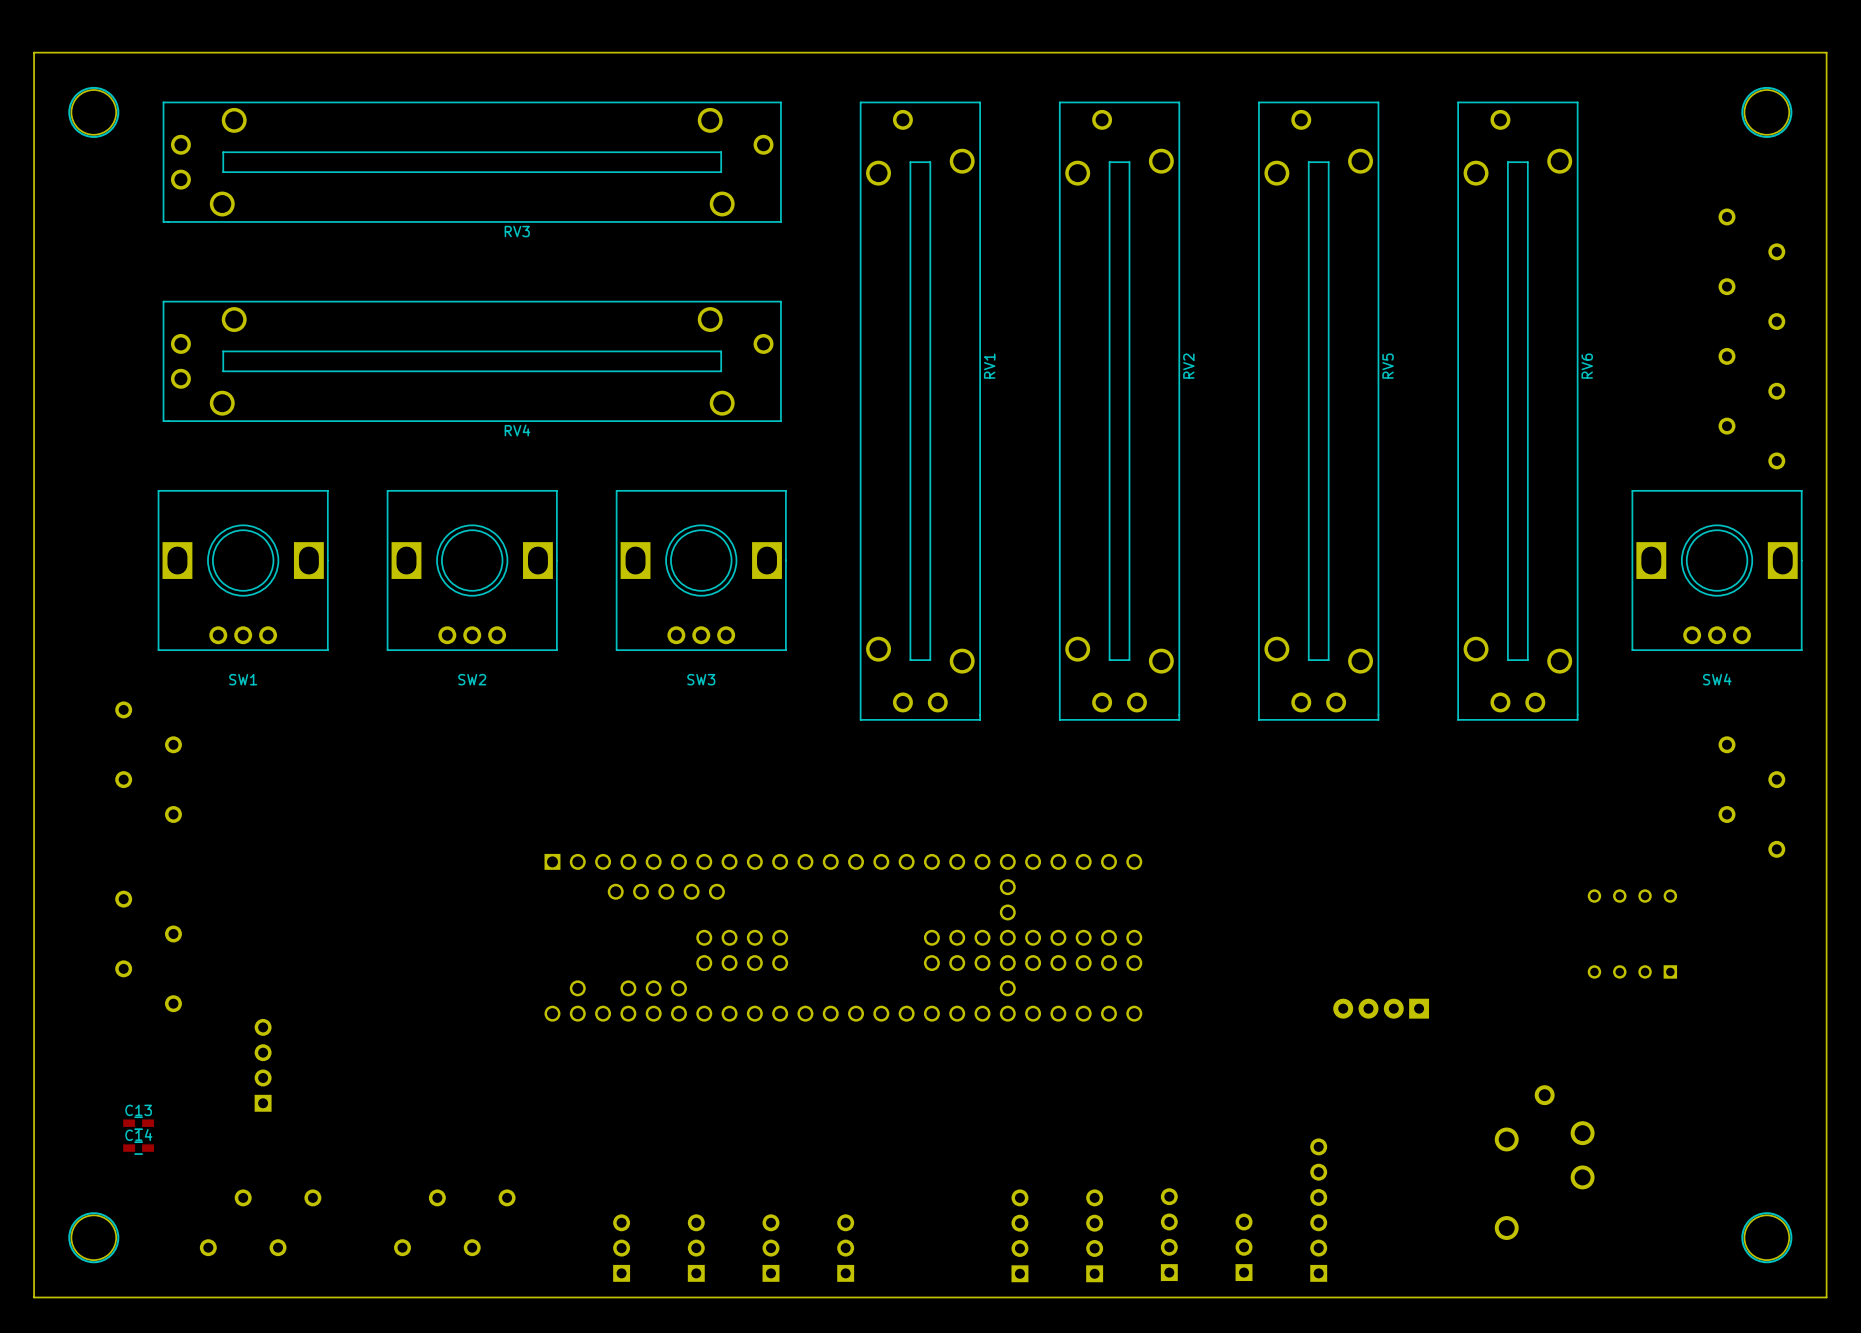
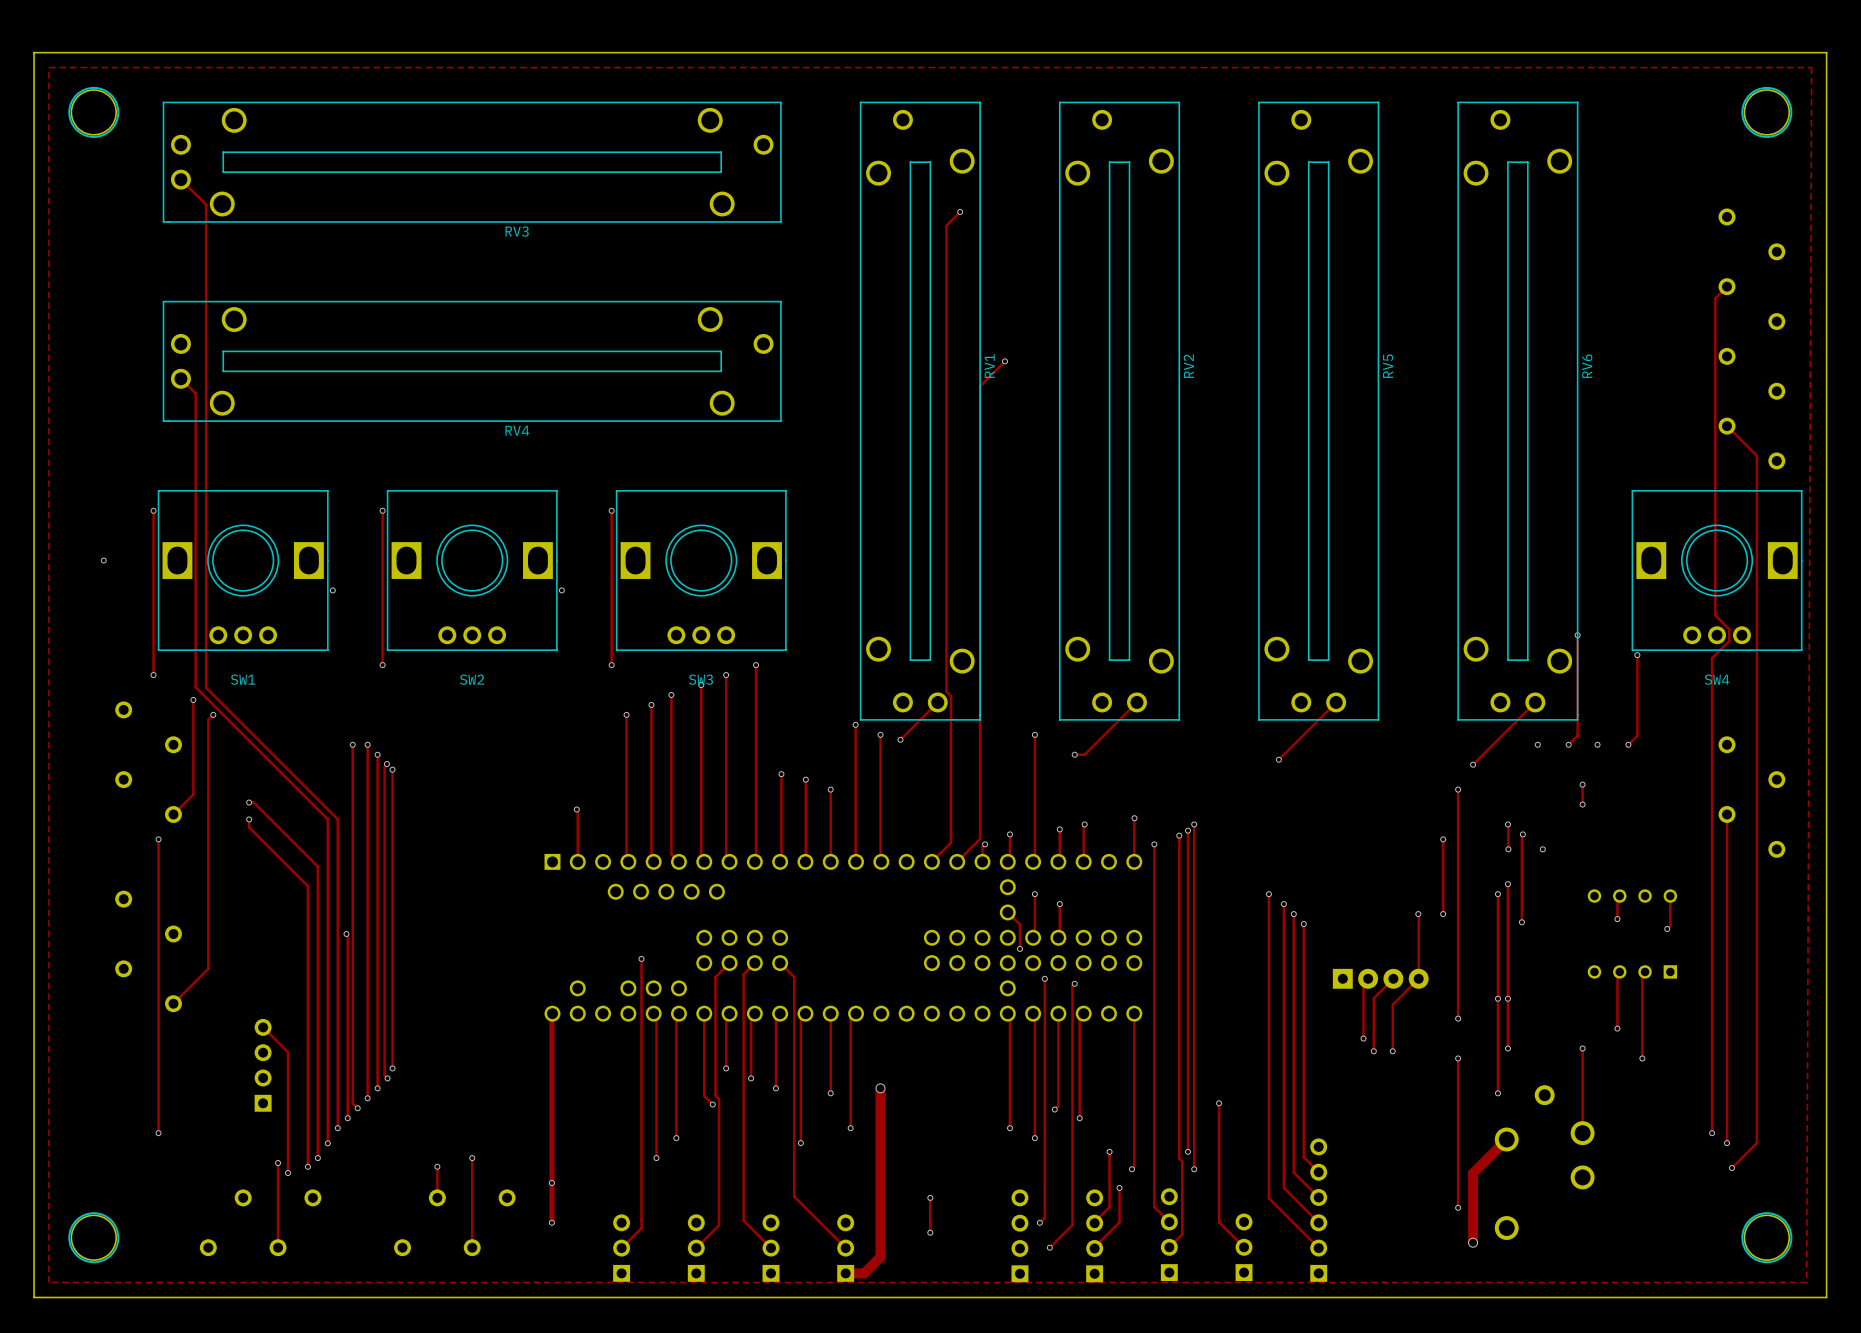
zone outline: none -> (48, 67) (1811, 67) (1806, 1282) (48, 1282) (48, 67)
track: none -> (180, 179) (206, 204) (206, 687) (337, 819) (337, 1128)
track: none -> (960, 211) (946, 225) (946, 691) (950, 696) (950, 842) (931, 861)
via: none -> (960, 211)
track: none -> (1727, 286) (1715, 298) (1715, 615) (1729, 629) (1729, 641) (1712, 658) (1712, 1133)
track: none -> (1005, 361) (980, 386) (980, 838) (957, 861)
via: none -> (1005, 361)
track: none -> (180, 378) (195, 393) (195, 687) (327, 819) (327, 1143)
track: none -> (1727, 426) (1756, 455) (1756, 1143) (1731, 1168)
track: none -> (153, 510) (153, 675)
via: none -> (153, 510)
track: none -> (382, 510) (382, 665)
via: none -> (382, 510)
track: none -> (611, 510) (611, 665)
via: none -> (611, 510)
via: none -> (103, 560)
via: none -> (332, 590)
via: none -> (561, 590)
track: none -> (1577, 635) (1577, 735) (1568, 744)
via: none -> (1577, 635)
track: none -> (1637, 655) (1637, 735) (1628, 744)
via: none -> (1637, 655)
via: none -> (382, 665)
via: none -> (611, 665)
track: none -> (756, 665) (754, 861)
via: none -> (756, 665)
via: none -> (153, 675)
track: none -> (726, 675) (726, 858) (729, 861)
via: none -> (726, 675)
track: none -> (701, 685) (701, 858) (704, 861)
via: none -> (701, 685)
track: none -> (671, 694) (671, 854) (678, 861)
via: none -> (671, 694)
track: none -> (193, 699) (193, 794) (173, 814)
via: none -> (193, 699)
track: none -> (937, 702) (900, 739)
track: none -> (1136, 702) (1084, 754) (1074, 754)
track: none -> (1336, 702) (1278, 759)
track: none -> (1535, 702) (1473, 764)
track: none -> (651, 704) (651, 859) (653, 861)
via: none -> (651, 704)
track: none -> (213, 714) (208, 719) (208, 968) (173, 1003)
via: none -> (213, 714)
track: none -> (626, 714) (626, 860) (628, 861)
via: none -> (626, 714)
track: none -> (855, 724) (856, 861)
via: none -> (855, 724)
track: none -> (880, 734) (881, 861)
via: none -> (880, 734)
track: none -> (1034, 734) (1034, 860) (1033, 861)
via: none -> (1034, 734)
via: none -> (900, 739)
track: none -> (352, 744) (352, 1103) (357, 1108)
via: none -> (352, 744)
track: none -> (367, 744) (367, 1098)
via: none -> (367, 744)
via: none -> (1537, 744)
via: none -> (1568, 744)
via: none -> (1597, 744)
via: none -> (1628, 744)
track: none -> (377, 754) (377, 1088)
via: none -> (377, 754)
via: none -> (1074, 754)
via: none -> (1278, 759)
track: none -> (386, 764) (384, 767) (384, 1075) (387, 1078)
via: none -> (386, 764)
via: none -> (1473, 764)
track: none -> (392, 769) (392, 1068)
via: none -> (392, 769)
track: none -> (781, 774) (780, 861)
via: none -> (781, 774)
track: none -> (805, 779) (805, 861)
via: none -> (805, 779)
track: none -> (1582, 784) (1582, 804)
via: none -> (1582, 784)
track: none -> (830, 789) (830, 861)
via: none -> (830, 789)
track: none -> (1458, 789) (1458, 1018)
via: none -> (1458, 789)
track: none -> (249, 802) (253, 802) (317, 866) (317, 1158)
via: none -> (249, 802)
via: none -> (1582, 804)
track: none -> (576, 809) (577, 861)
via: none -> (576, 809)
track: none -> (1727, 814) (1727, 1143)
track: none -> (1134, 818) (1134, 861)
via: none -> (1134, 818)
track: none -> (249, 819) (249, 827) (307, 886) (307, 1166)
via: none -> (249, 819)
track: none -> (1084, 824) (1083, 861)
via: none -> (1084, 824)
track: none -> (1194, 824) (1194, 1169)
via: none -> (1194, 824)
track: none -> (1507, 824) (1508, 849)
via: none -> (1507, 824)
track: none -> (1059, 829) (1058, 861)
via: none -> (1059, 829)
track: none -> (1188, 830) (1188, 1151)
via: none -> (1188, 830)
track: none -> (1009, 834) (1009, 859) (1007, 861)
via: none -> (1009, 834)
track: none -> (1522, 834) (1521, 922)
via: none -> (1522, 834)
track: none -> (1179, 835) (1179, 1158) (1182, 1161) (1182, 1234) (1169, 1247)
via: none -> (1179, 835)
track: none -> (158, 839) (158, 1133)
via: none -> (158, 839)
track: none -> (1443, 839) (1443, 914)
via: none -> (1443, 839)
track: none -> (985, 844) (982, 846) (982, 861)
via: none -> (985, 844)
track: none -> (1154, 844) (1154, 1207) (1169, 1221)
via: none -> (1154, 844)
via: none -> (1508, 849)
via: none -> (1542, 849)
track: none -> (1507, 884) (1507, 1048)
via: none -> (1507, 884)
track: none -> (1034, 894) (1034, 935) (1033, 937)
via: none -> (1034, 894)
track: none -> (1268, 894) (1268, 1198) (1318, 1248)
via: none -> (1268, 894)
track: none -> (1497, 894) (1497, 1093)
via: none -> (1497, 894)
track: none -> (1619, 896) (1617, 898) (1617, 919)
track: none -> (1670, 896) (1670, 925) (1667, 929)
track: none -> (1059, 904) (1058, 937)
via: none -> (1059, 904)
track: none -> (1283, 904) (1283, 1187) (1318, 1222)
via: none -> (1283, 904)
track: none -> (1007, 912) (1019, 924) (1019, 948)
track: none -> (1293, 914) (1293, 1172) (1318, 1197)
via: none -> (1293, 914)
track: none -> (1418, 914) (1418, 978) (1392, 1004) (1392, 1051)
via: none -> (1418, 914)
via: none -> (1443, 914)
via: none -> (1617, 919)
via: none -> (1521, 922)
track: none -> (1303, 924) (1303, 1157) (1318, 1172)
via: none -> (1303, 924)
via: none -> (1667, 929)
track: none -> (346, 933) (347, 1118)
via: none -> (346, 933)
via: none -> (1019, 948)
track: none -> (641, 958) (641, 1228) (621, 1248)
via: none -> (641, 958)
track: none -> (729, 963) (715, 977) (715, 1095) (719, 1099) (719, 1225) (696, 1248)
track: none -> (754, 963) (743, 974) (743, 1220) (770, 1248)
track: none -> (780, 963) (794, 977) (794, 1196) (845, 1248)
track: none -> (1619, 971) (1617, 974) (1617, 1028)
track: none -> (1645, 971) (1642, 974) (1642, 1058)
track: none -> (1044, 978) (1044, 1217) (1039, 1222)
via: none -> (1044, 978)
track: none -> (1368, 978) (1363, 983) (1363, 1038)
track: none -> (1393, 978) (1373, 998) (1373, 1051)
track: none -> (1074, 983) (1072, 986) (1072, 1225) (1049, 1247)
via: none -> (1074, 983)
via: none -> (1497, 998)
via: none -> (1507, 998)
part rotation: 0° (1381, 1008) -> 180° (1380, 978)
track: none -> (552, 1013) (551, 1222)
track: none -> (653, 1013) (656, 1016) (656, 1158)
track: none -> (678, 1013) (676, 1016) (676, 1138)
track: none -> (704, 1013) (704, 1096) (712, 1104)
track: none -> (729, 1013) (726, 1017) (726, 1068)
track: none -> (754, 1013) (751, 1017) (751, 1078)
track: none -> (780, 1013) (775, 1017) (775, 1088)
track: none -> (805, 1013) (800, 1018) (800, 1143)
track: none -> (830, 1013) (830, 1093)
track: none -> (856, 1013) (850, 1019) (850, 1128)
track: none -> (1007, 1013) (1009, 1015) (1009, 1128)
track: none -> (1033, 1013) (1034, 1015) (1034, 1138)
track: none -> (1058, 1013) (1058, 1105) (1054, 1109)
track: none -> (1083, 1013) (1079, 1017) (1079, 1118)
track: none -> (1134, 1013) (1134, 1166) (1131, 1169)
via: none -> (1458, 1018)
track: none -> (263, 1027) (287, 1052) (287, 1172)
via: none -> (1617, 1028)
via: none -> (1363, 1038)
via: none -> (1507, 1048)
track: none -> (1582, 1048) (1582, 1133)
via: none -> (1582, 1048)
via: none -> (1373, 1051)
via: none -> (1392, 1051)
track: none -> (1458, 1058) (1458, 1207)
via: none -> (1458, 1058)
via: none -> (1642, 1058)
via: none -> (392, 1068)
via: none -> (726, 1068)
via: none -> (387, 1078)
via: none -> (751, 1078)
via: none -> (377, 1088)
via: none -> (775, 1088)
track: none -> (880, 1088) (880, 1256) (864, 1273) (845, 1273)
via: none -> (880, 1088)
via: none -> (830, 1093)
via: none -> (1497, 1093)
via: none -> (367, 1098)
track: none -> (1219, 1103) (1219, 1222) (1244, 1247)
via: none -> (1219, 1103)
via: none -> (712, 1104)
via: none -> (357, 1108)
via: none -> (1054, 1109)
via: none -> (347, 1118)
via: none -> (1079, 1118)
C13: (138, 1123) -> none
via: none -> (337, 1128)
via: none -> (850, 1128)
via: none -> (1009, 1128)
via: none -> (158, 1133)
via: none -> (1712, 1133)
via: none -> (676, 1138)
via: none -> (1034, 1138)
track: none -> (1506, 1139) (1473, 1173) (1473, 1242)
via: none -> (327, 1143)
via: none -> (800, 1143)
via: none -> (1727, 1143)
C14: (138, 1148) -> none
track: none -> (1109, 1151) (1109, 1207) (1094, 1221)
via: none -> (1109, 1151)
via: none -> (1188, 1151)
via: none -> (317, 1158)
track: none -> (472, 1158) (472, 1247)
via: none -> (472, 1158)
via: none -> (656, 1158)
track: none -> (278, 1163) (278, 1247)
via: none -> (278, 1163)
via: none -> (307, 1166)
track: none -> (437, 1166) (437, 1197)
via: none -> (437, 1166)
via: none -> (1731, 1168)
via: none -> (1131, 1169)
via: none -> (1194, 1169)
via: none -> (287, 1172)
via: none -> (551, 1182)
track: none -> (1119, 1187) (1119, 1222) (1094, 1247)
via: none -> (1119, 1187)
track: none -> (930, 1197) (930, 1232)
via: none -> (930, 1197)
via: none -> (1458, 1207)
via: none -> (551, 1222)
via: none -> (1039, 1222)
via: none -> (930, 1232)
via: none -> (1473, 1242)
via: none -> (1049, 1247)

